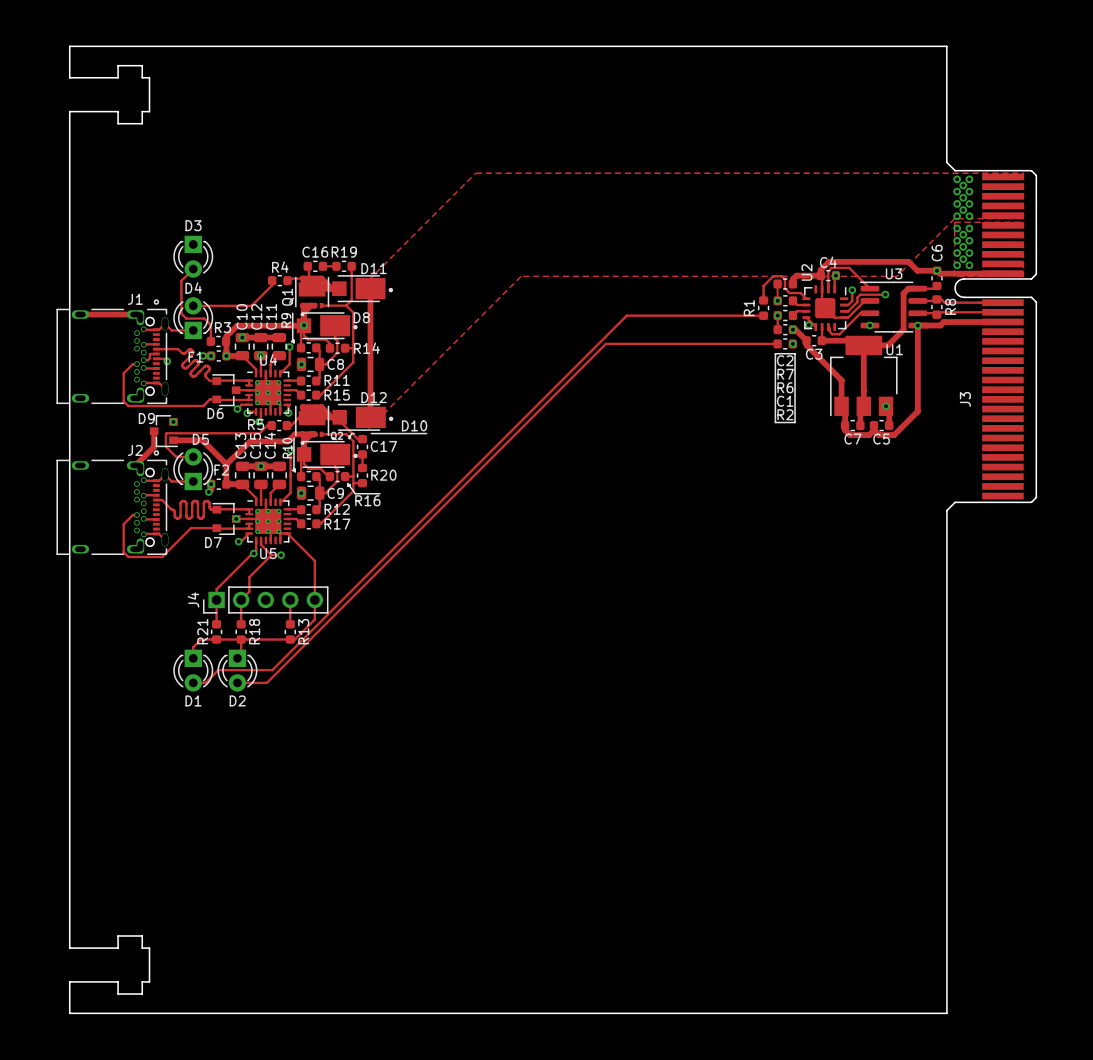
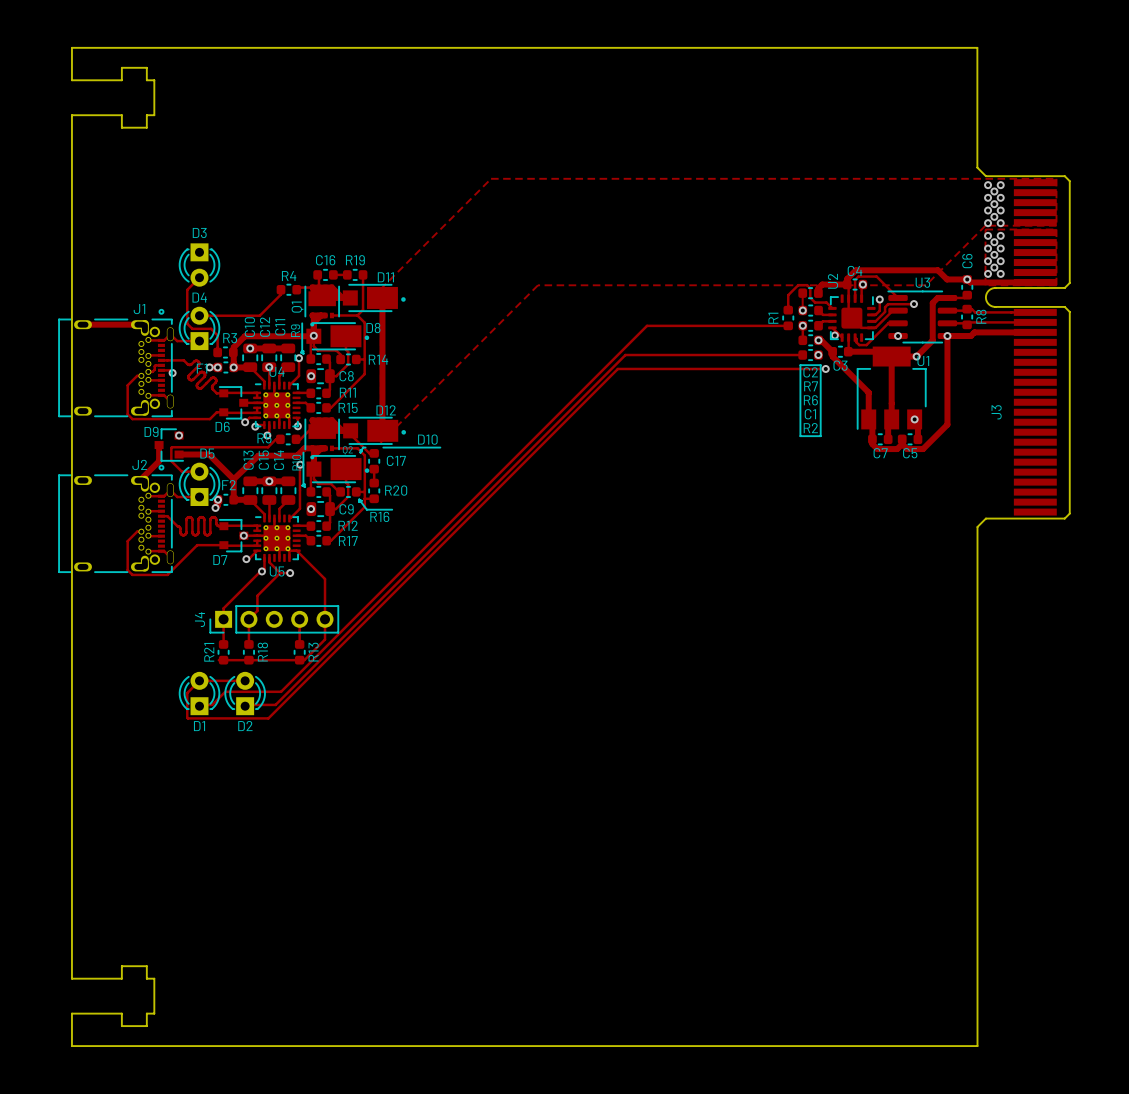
via: none -> (916, 356)
track: none -> (825, 368) (617, 368) (268, 718) (187, 717) (187, 693) (199, 680) (245, 680)
via: none -> (825, 368)
track: (212, 639) (200, 639) (193, 647) (193, 658) -> none
track: (241, 639) (241, 654) -> none
D1 rotation: 0° (193, 670) -> 180° (199, 693)
D2 rotation: 0° (237, 670) -> 180° (245, 693)

